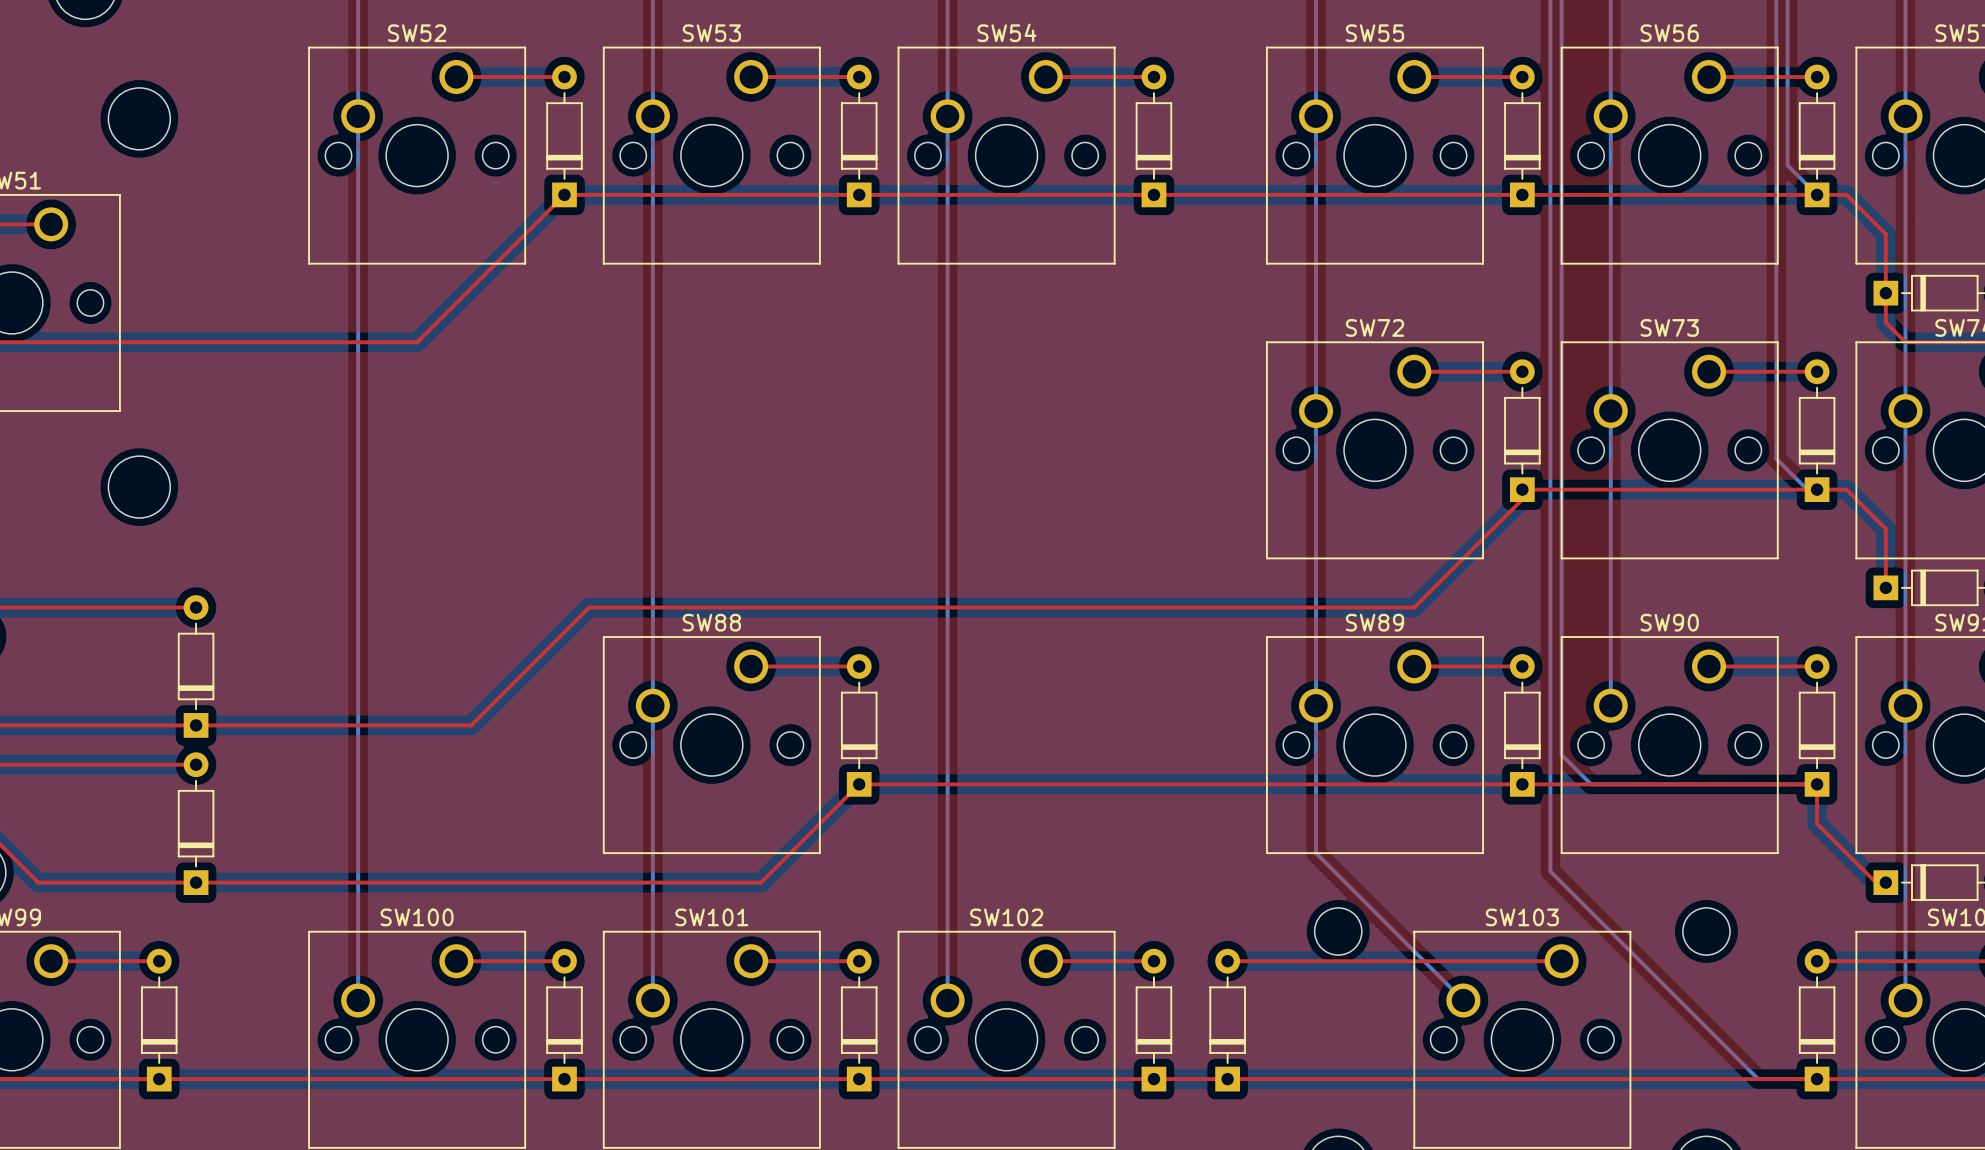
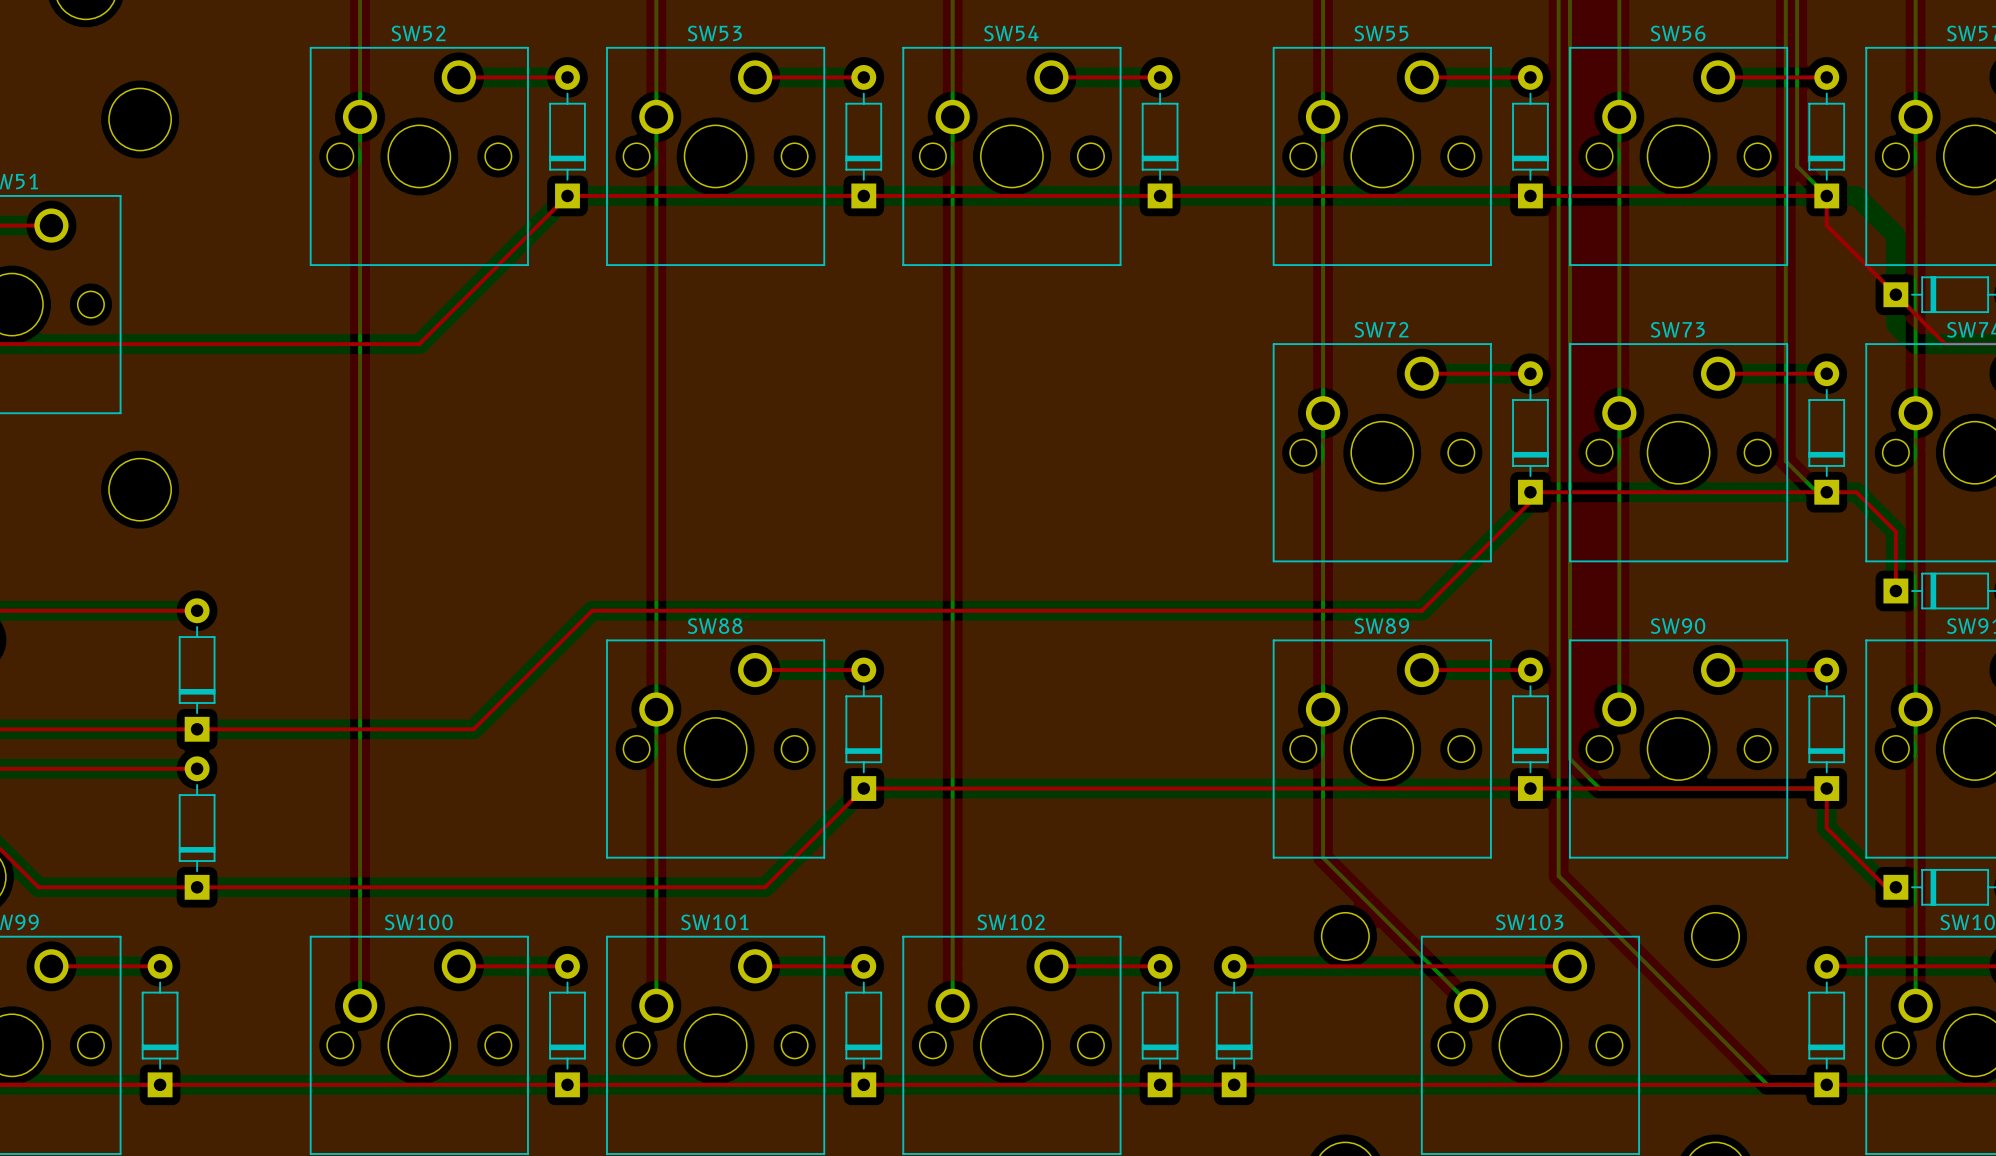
top track: (1817, 194) (1846, 194) (1885, 234) (1885, 322) (1905, 342) (1934, 342) -> (1826, 195) (1826, 225) (1945, 344)

